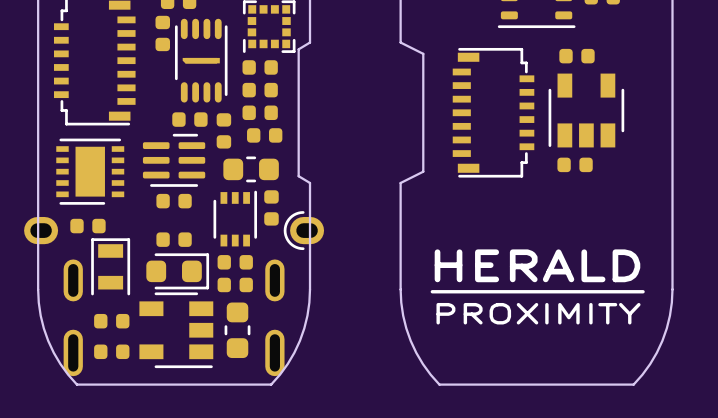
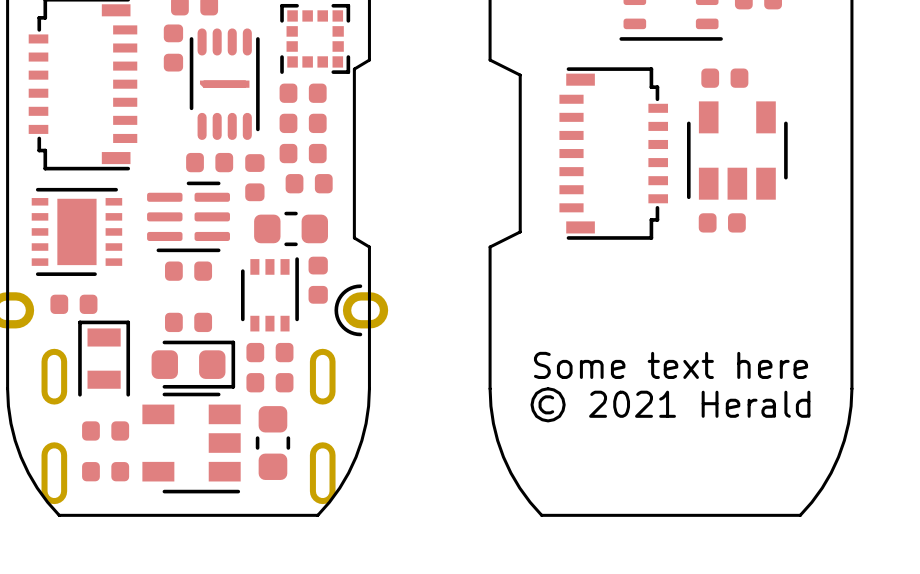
text: HERALD (537, 265) -> Some text here (671, 365)
line: (432, 291) (643, 291) -> none
text: PROXIMITY (538, 313) -> © 2021 Herald (670, 404)

